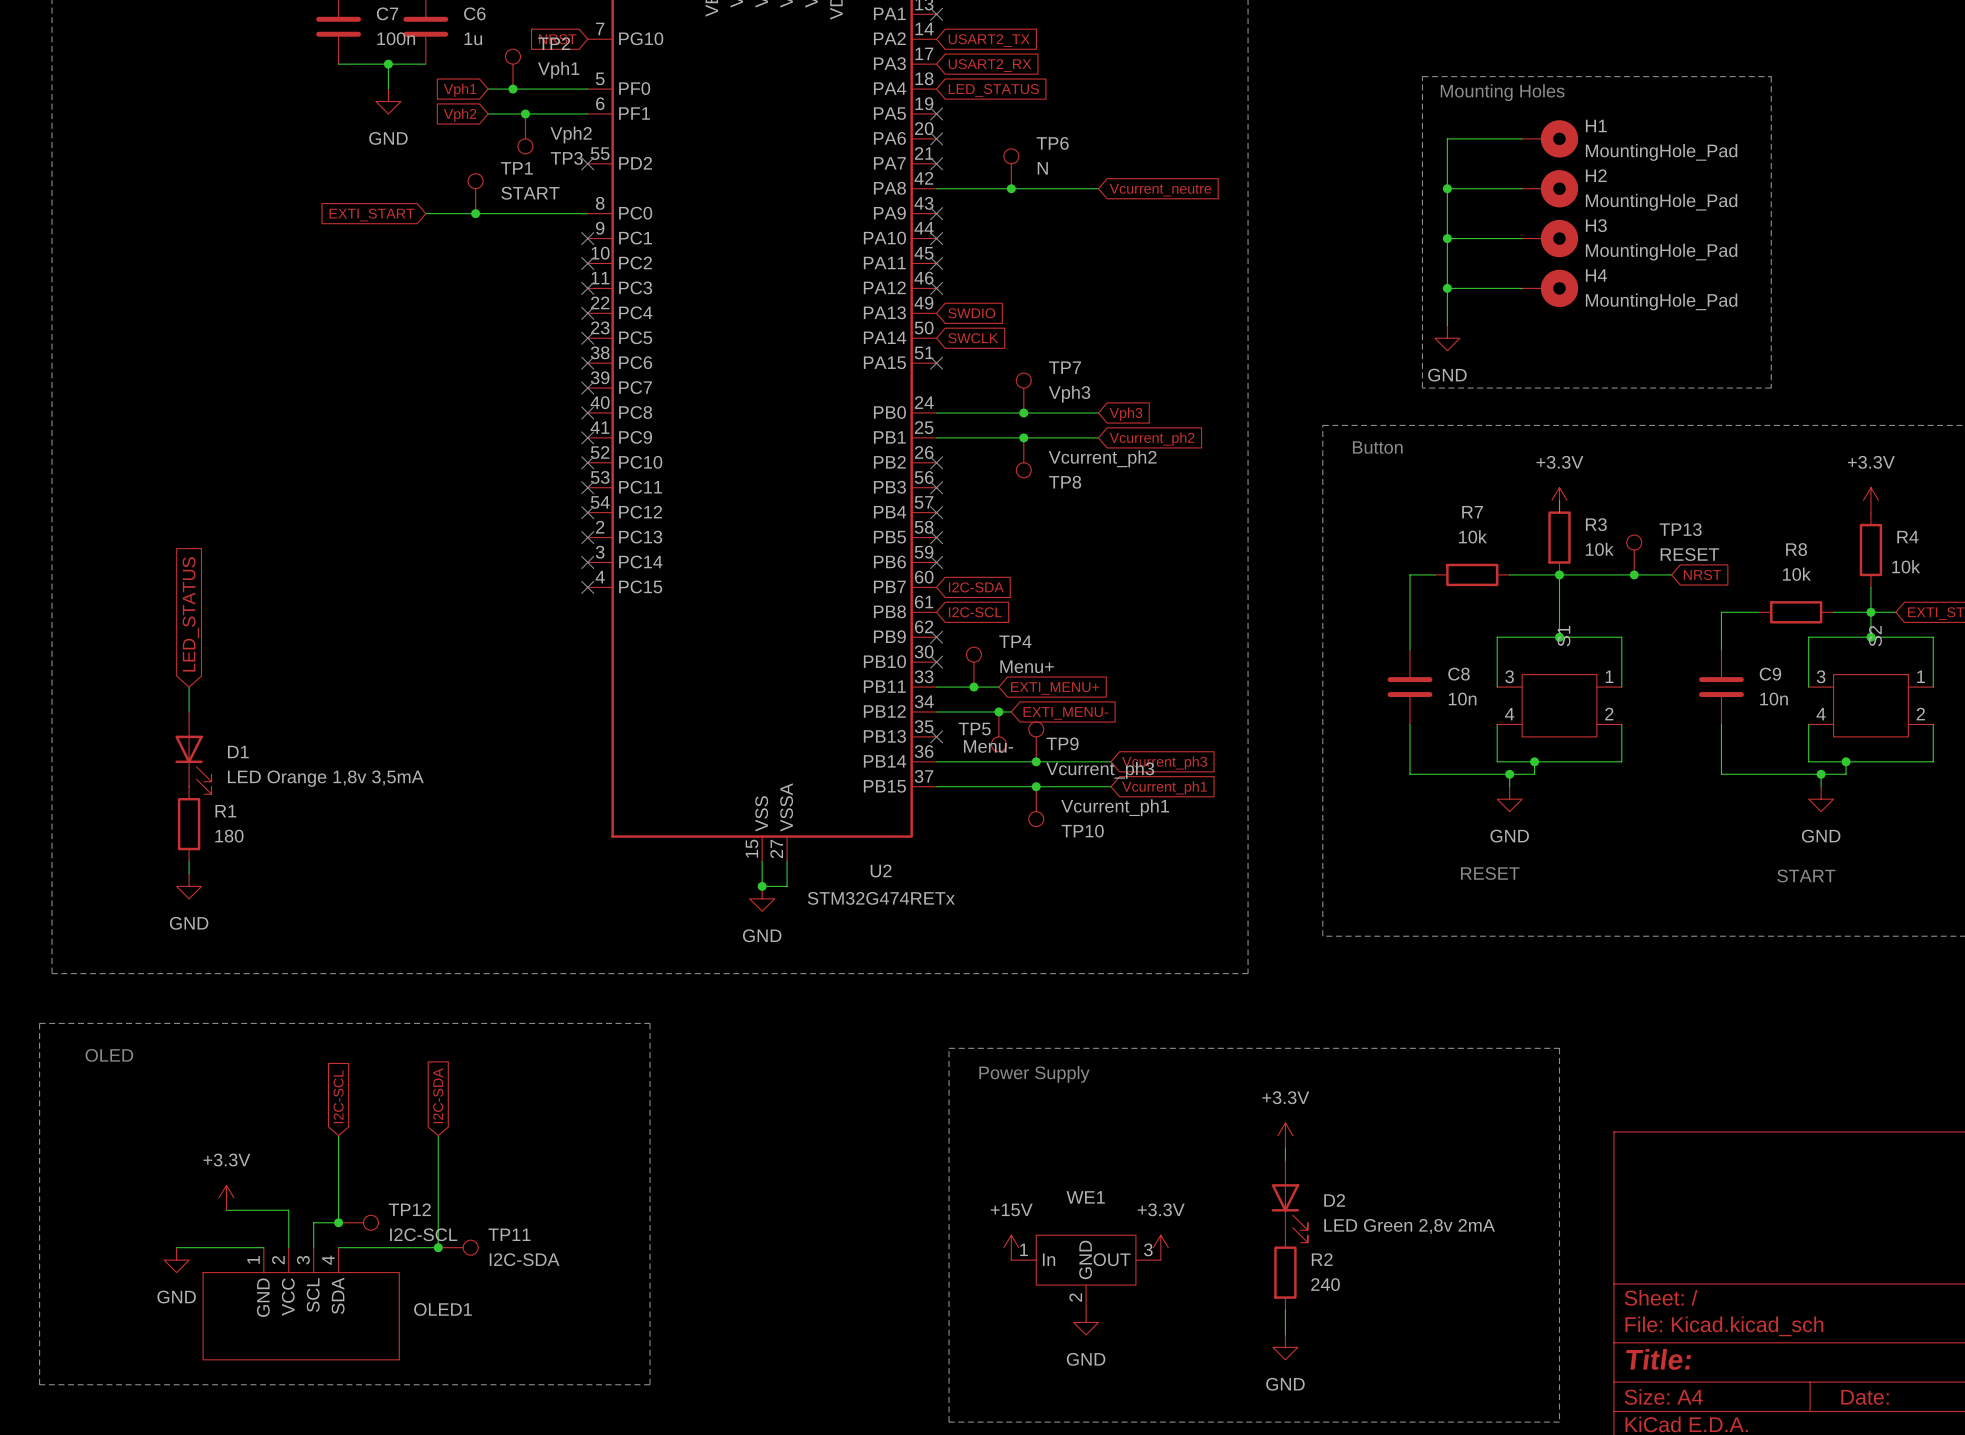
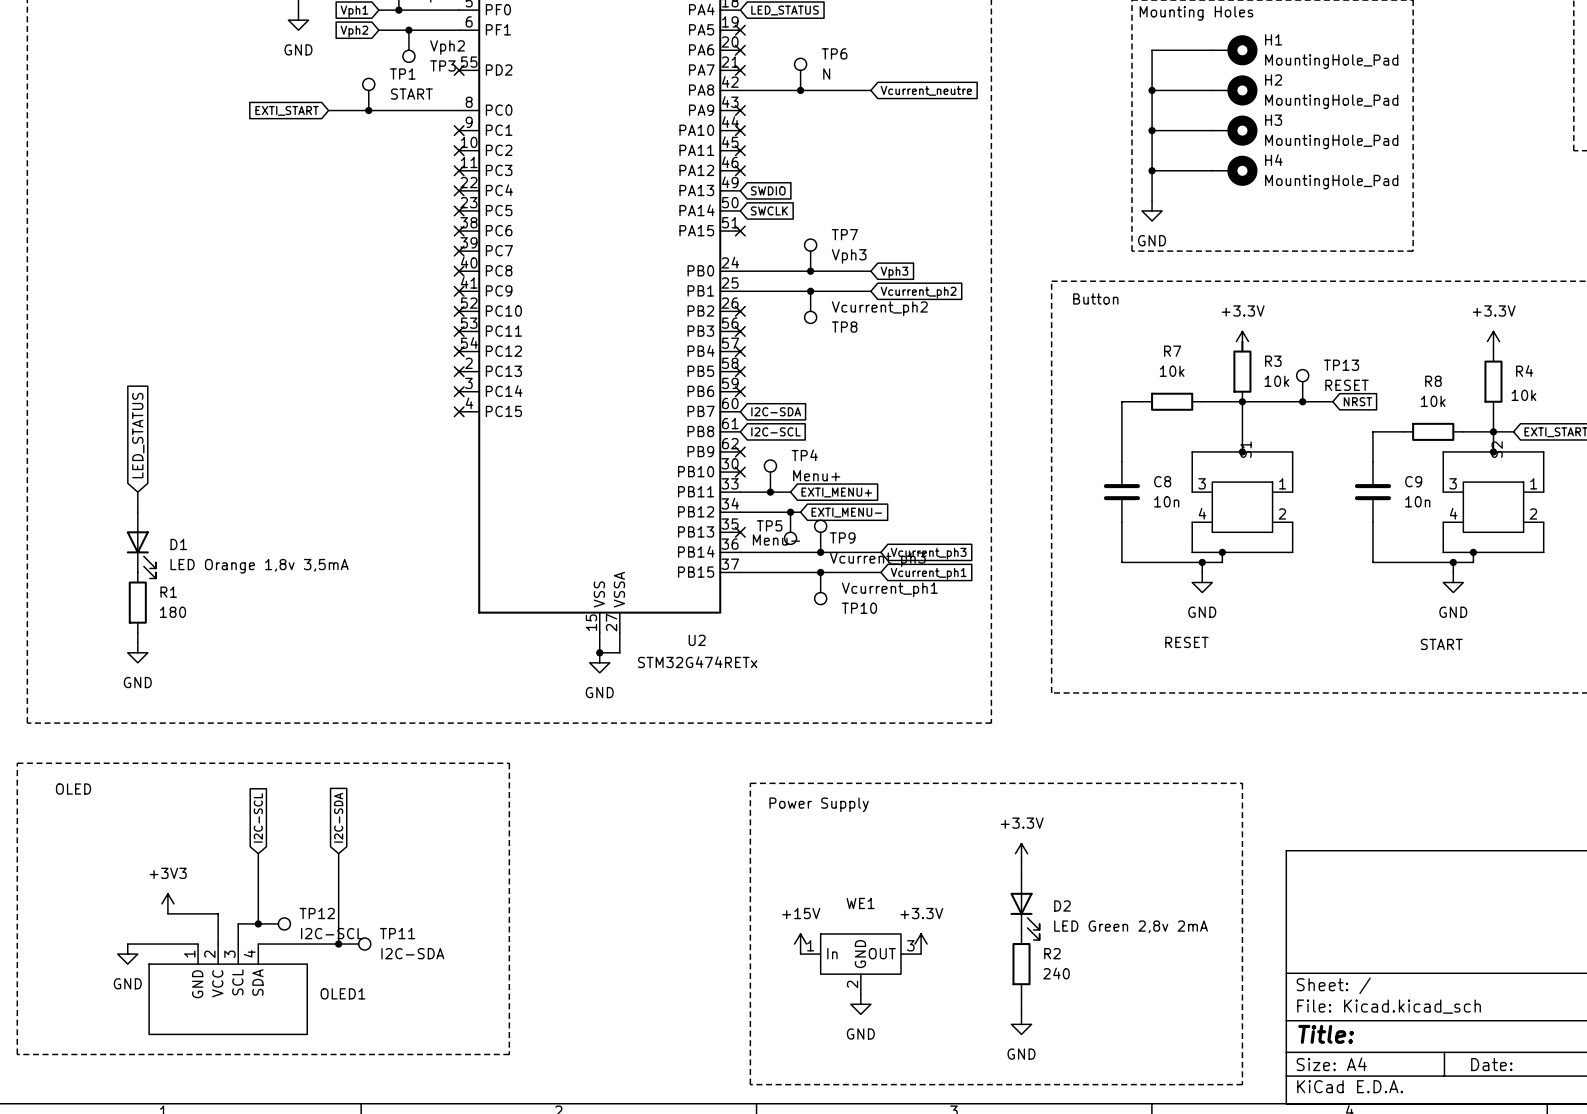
power symbol: +3.3V (226, 1197) -> +3V3 (167, 903)

